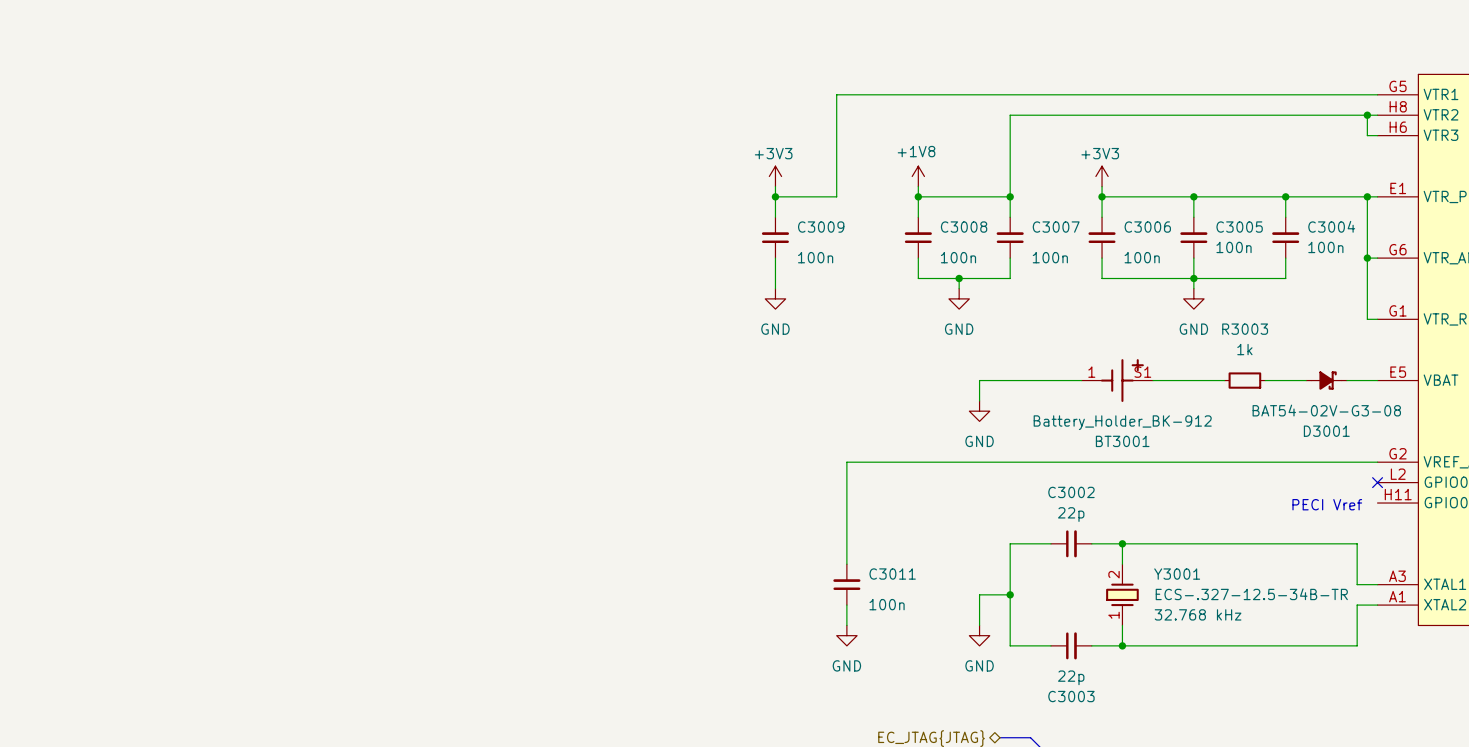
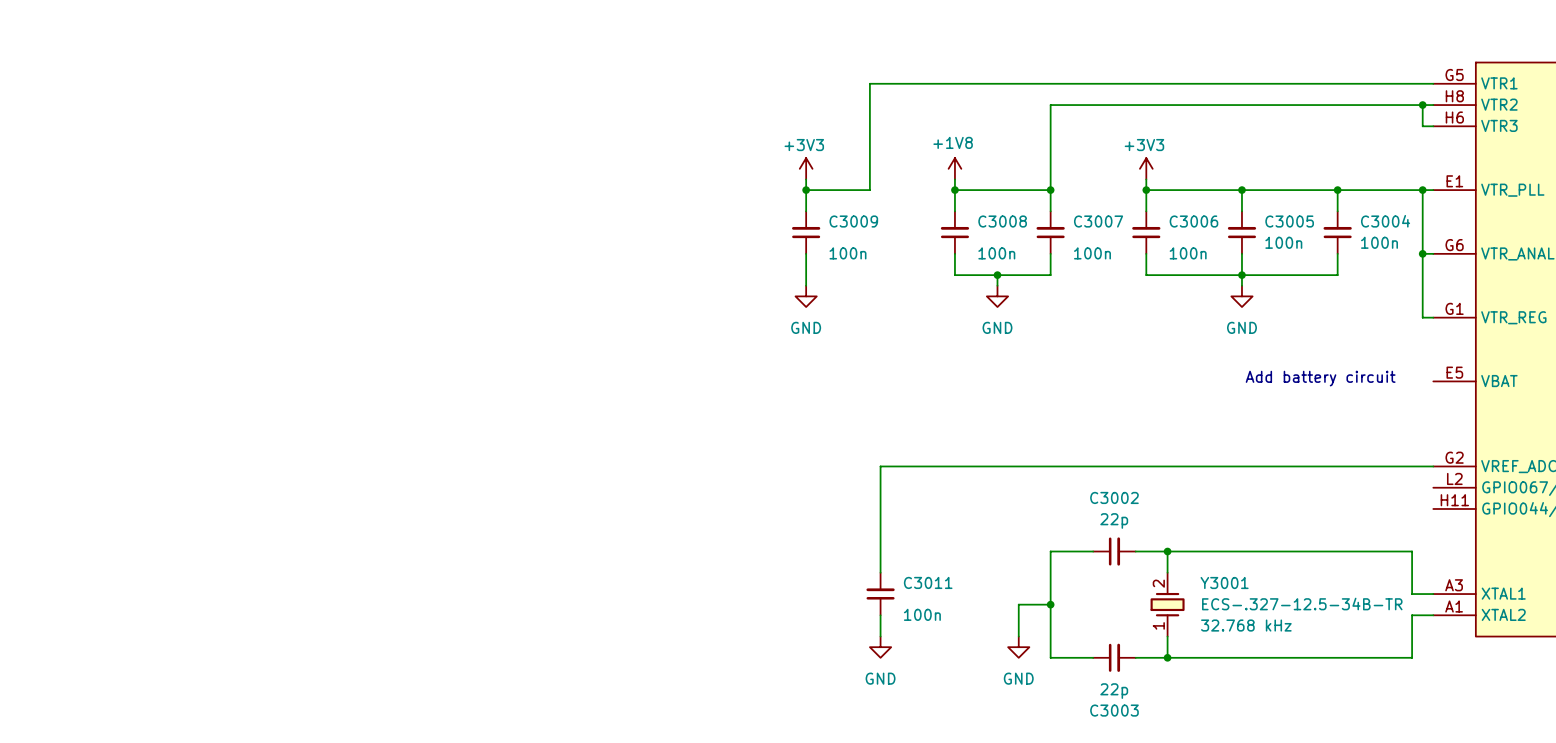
text: none -> Add battery circuit (1320, 378)
wire: (1081, 380) (979, 380) (979, 400) -> none
BT3001: Battery_Holder_BK-912 (1117, 380) -> none
wire: (1153, 380) (1224, 380) -> none
R3003: (1244, 380) -> none
wire: (1265, 380) (1306, 380) -> none
D3001: (1326, 380) -> none
wire: (1346, 380) (1377, 380) -> none
power symbol: GND (979, 411) -> none
no-connect mark: (1377, 482) -> none
text: PECI Vref (1327, 504) -> none

